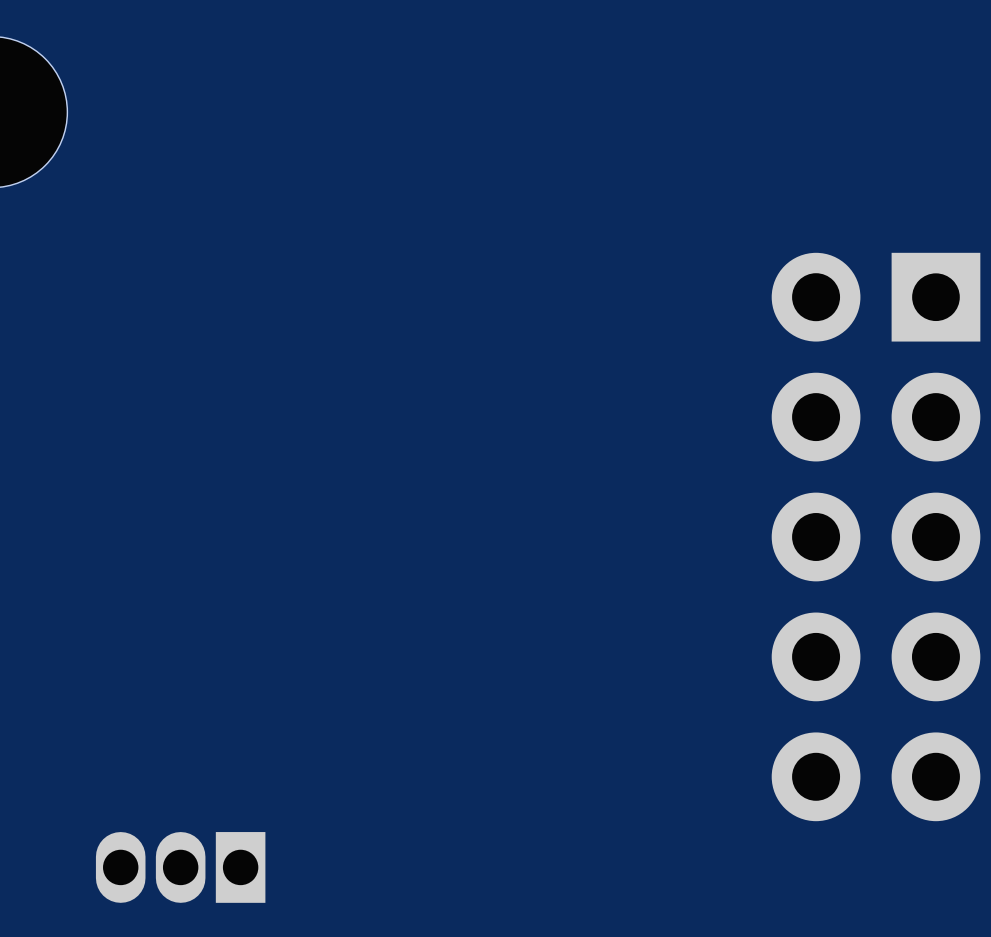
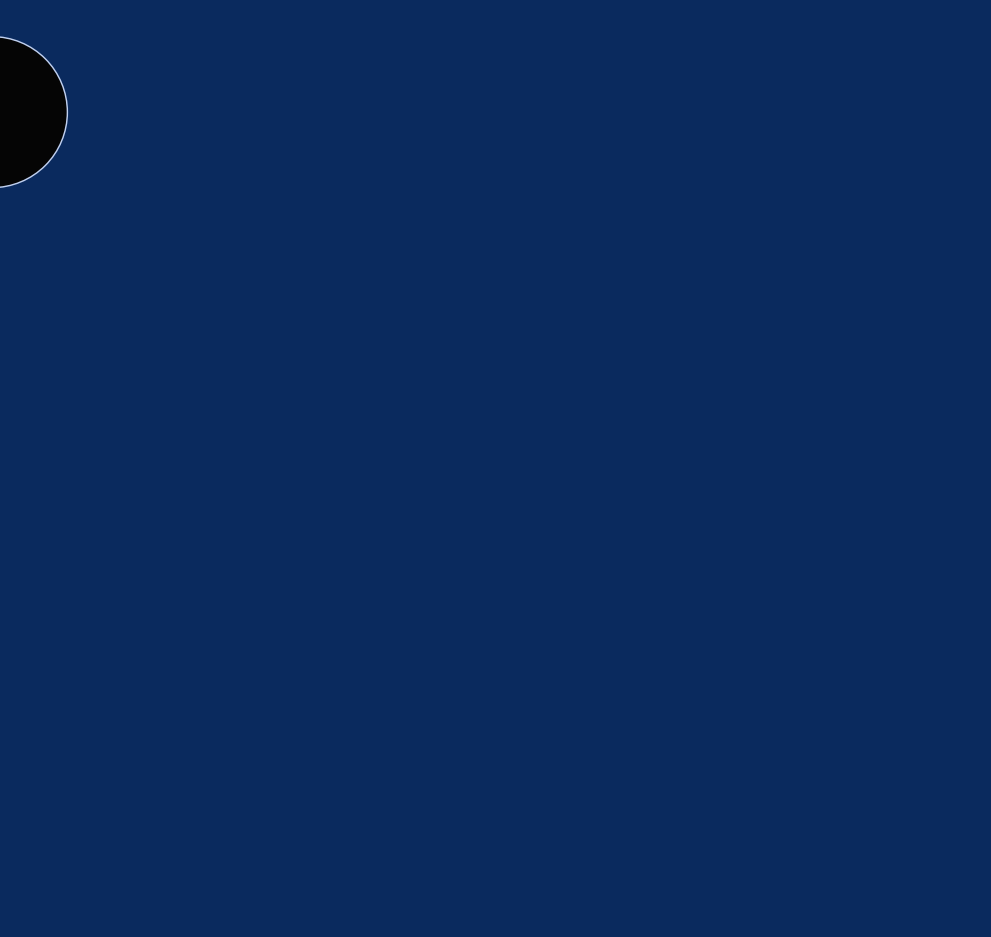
part: (876, 537) -> none
part: (180, 867) -> none

